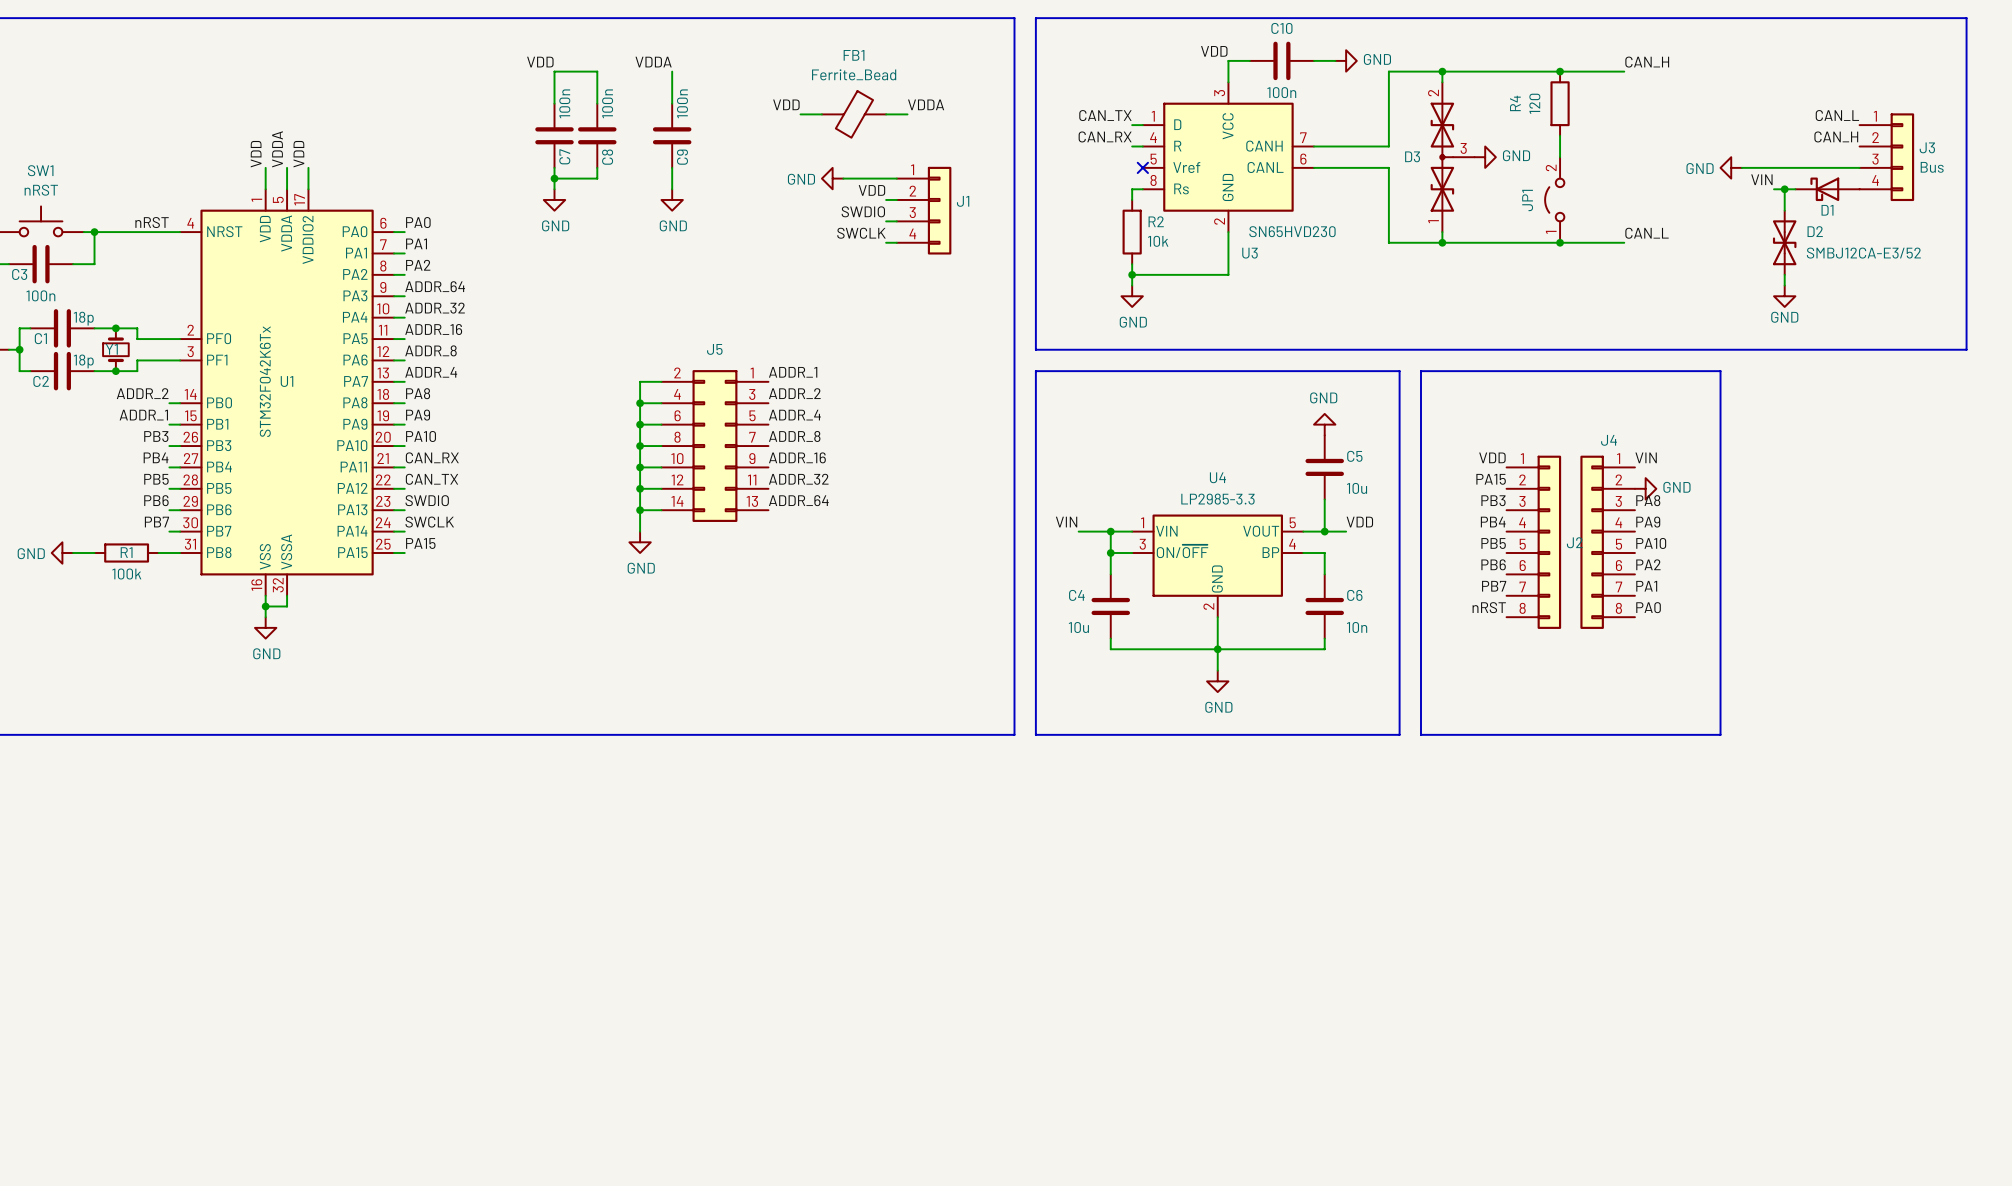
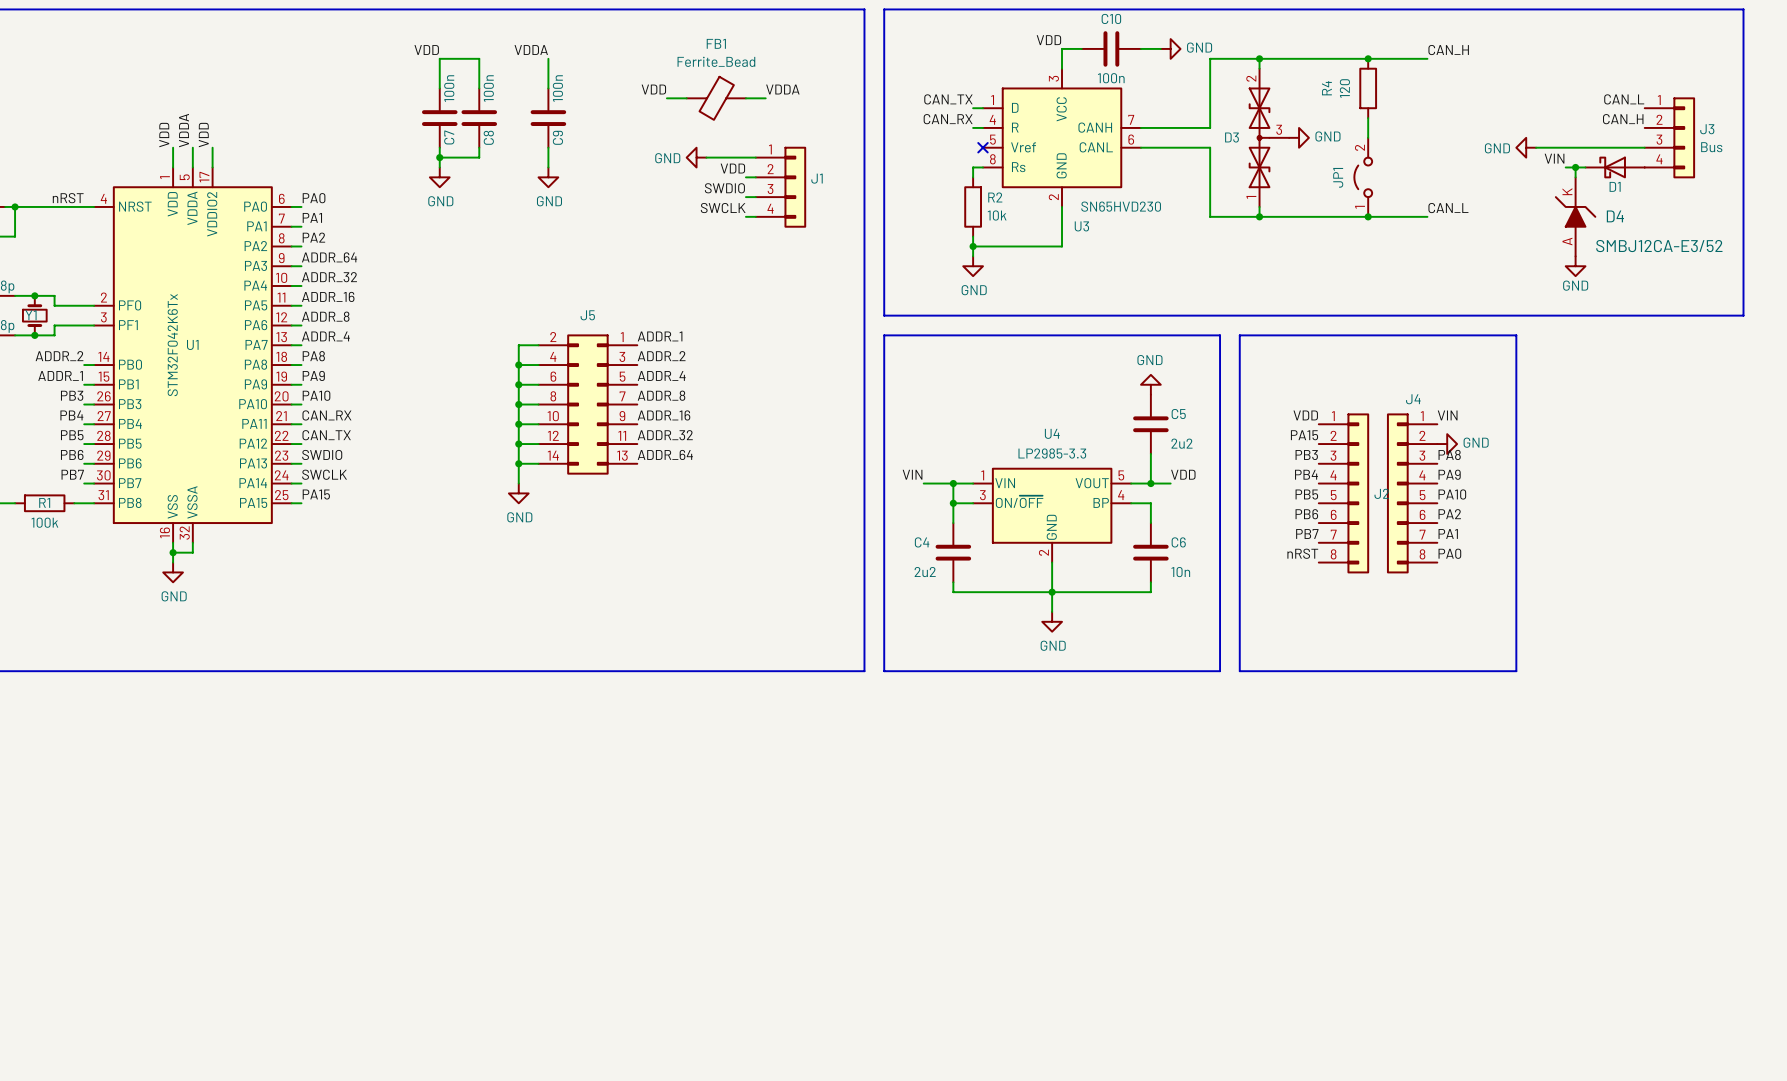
D2: SMBJ12CA-E3/52 (1784, 242) -> none
D4: none -> SMBJ12CA-E3/52 (1575, 216)
C5 value: 10u (1357, 488) -> 2u2 (1181, 443)
C4 value: 10u (1078, 627) -> 2u2 (925, 572)

